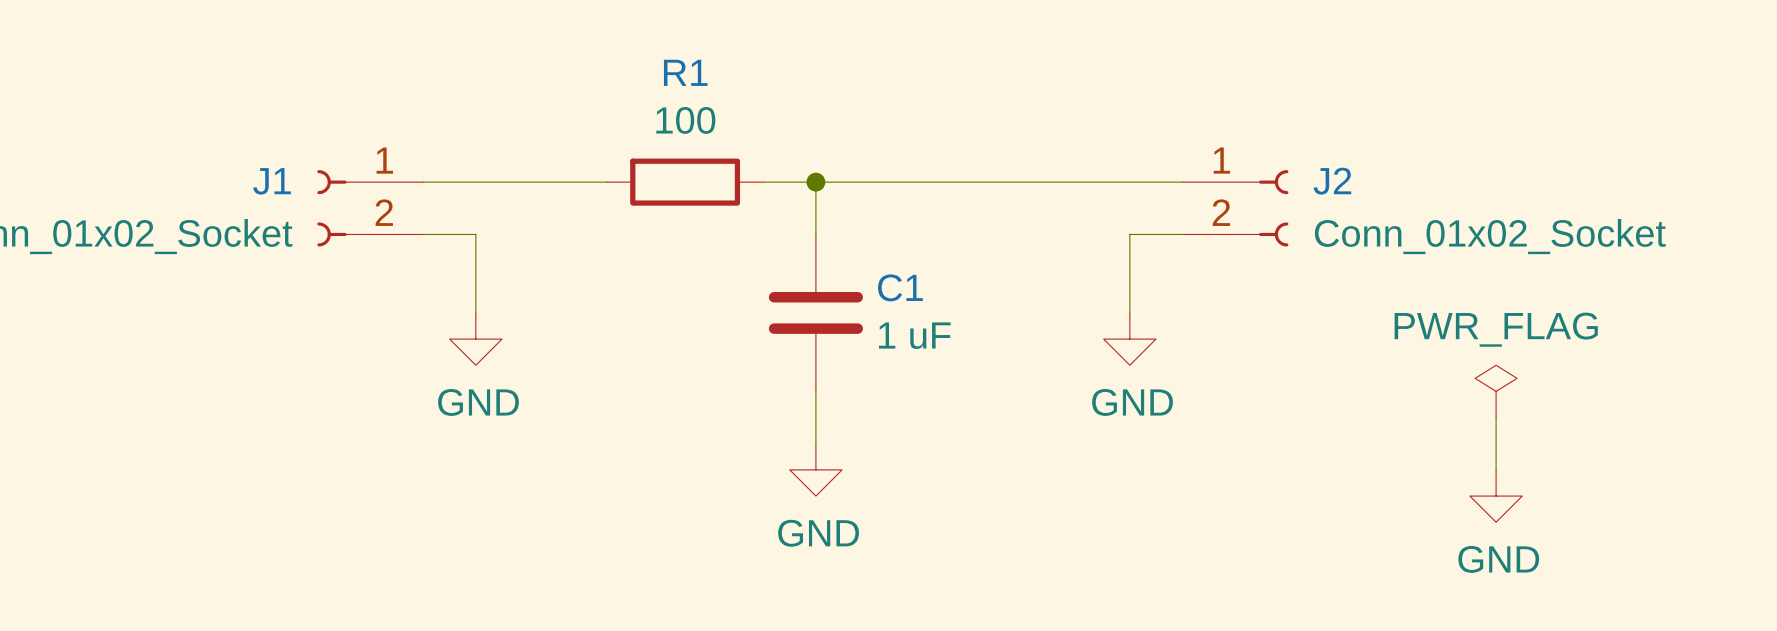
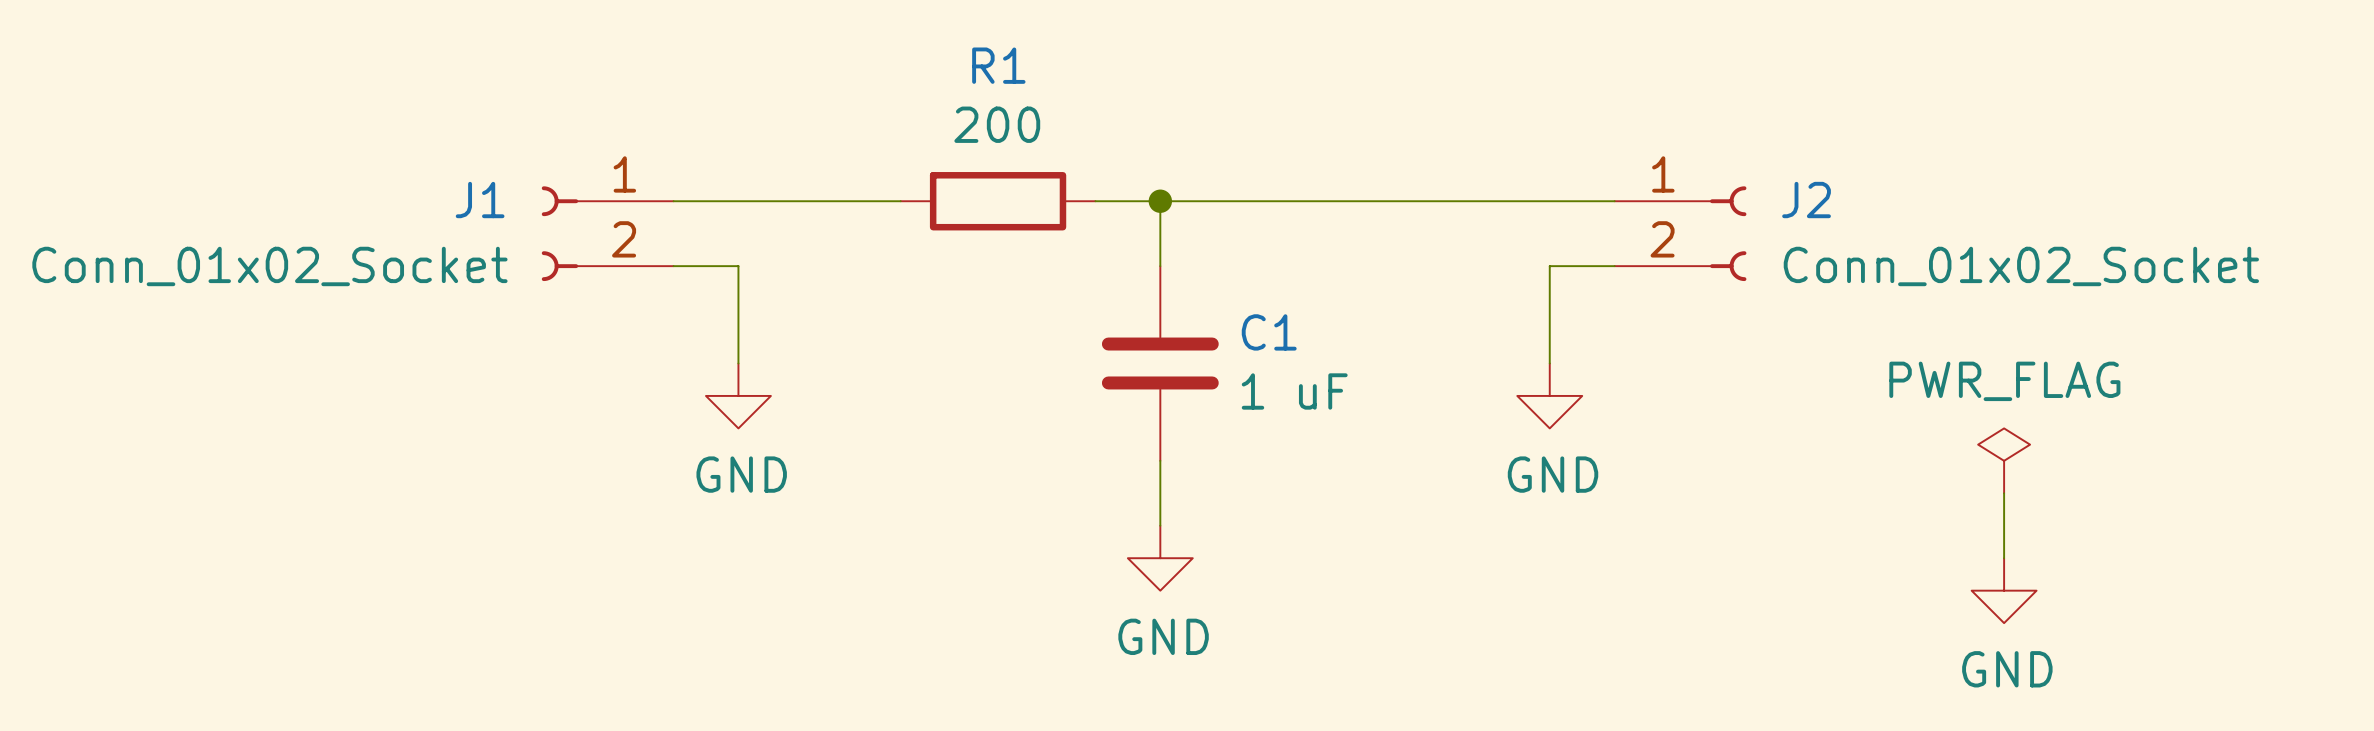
R1 value: 100 (685, 120) -> 200 (997, 124)

